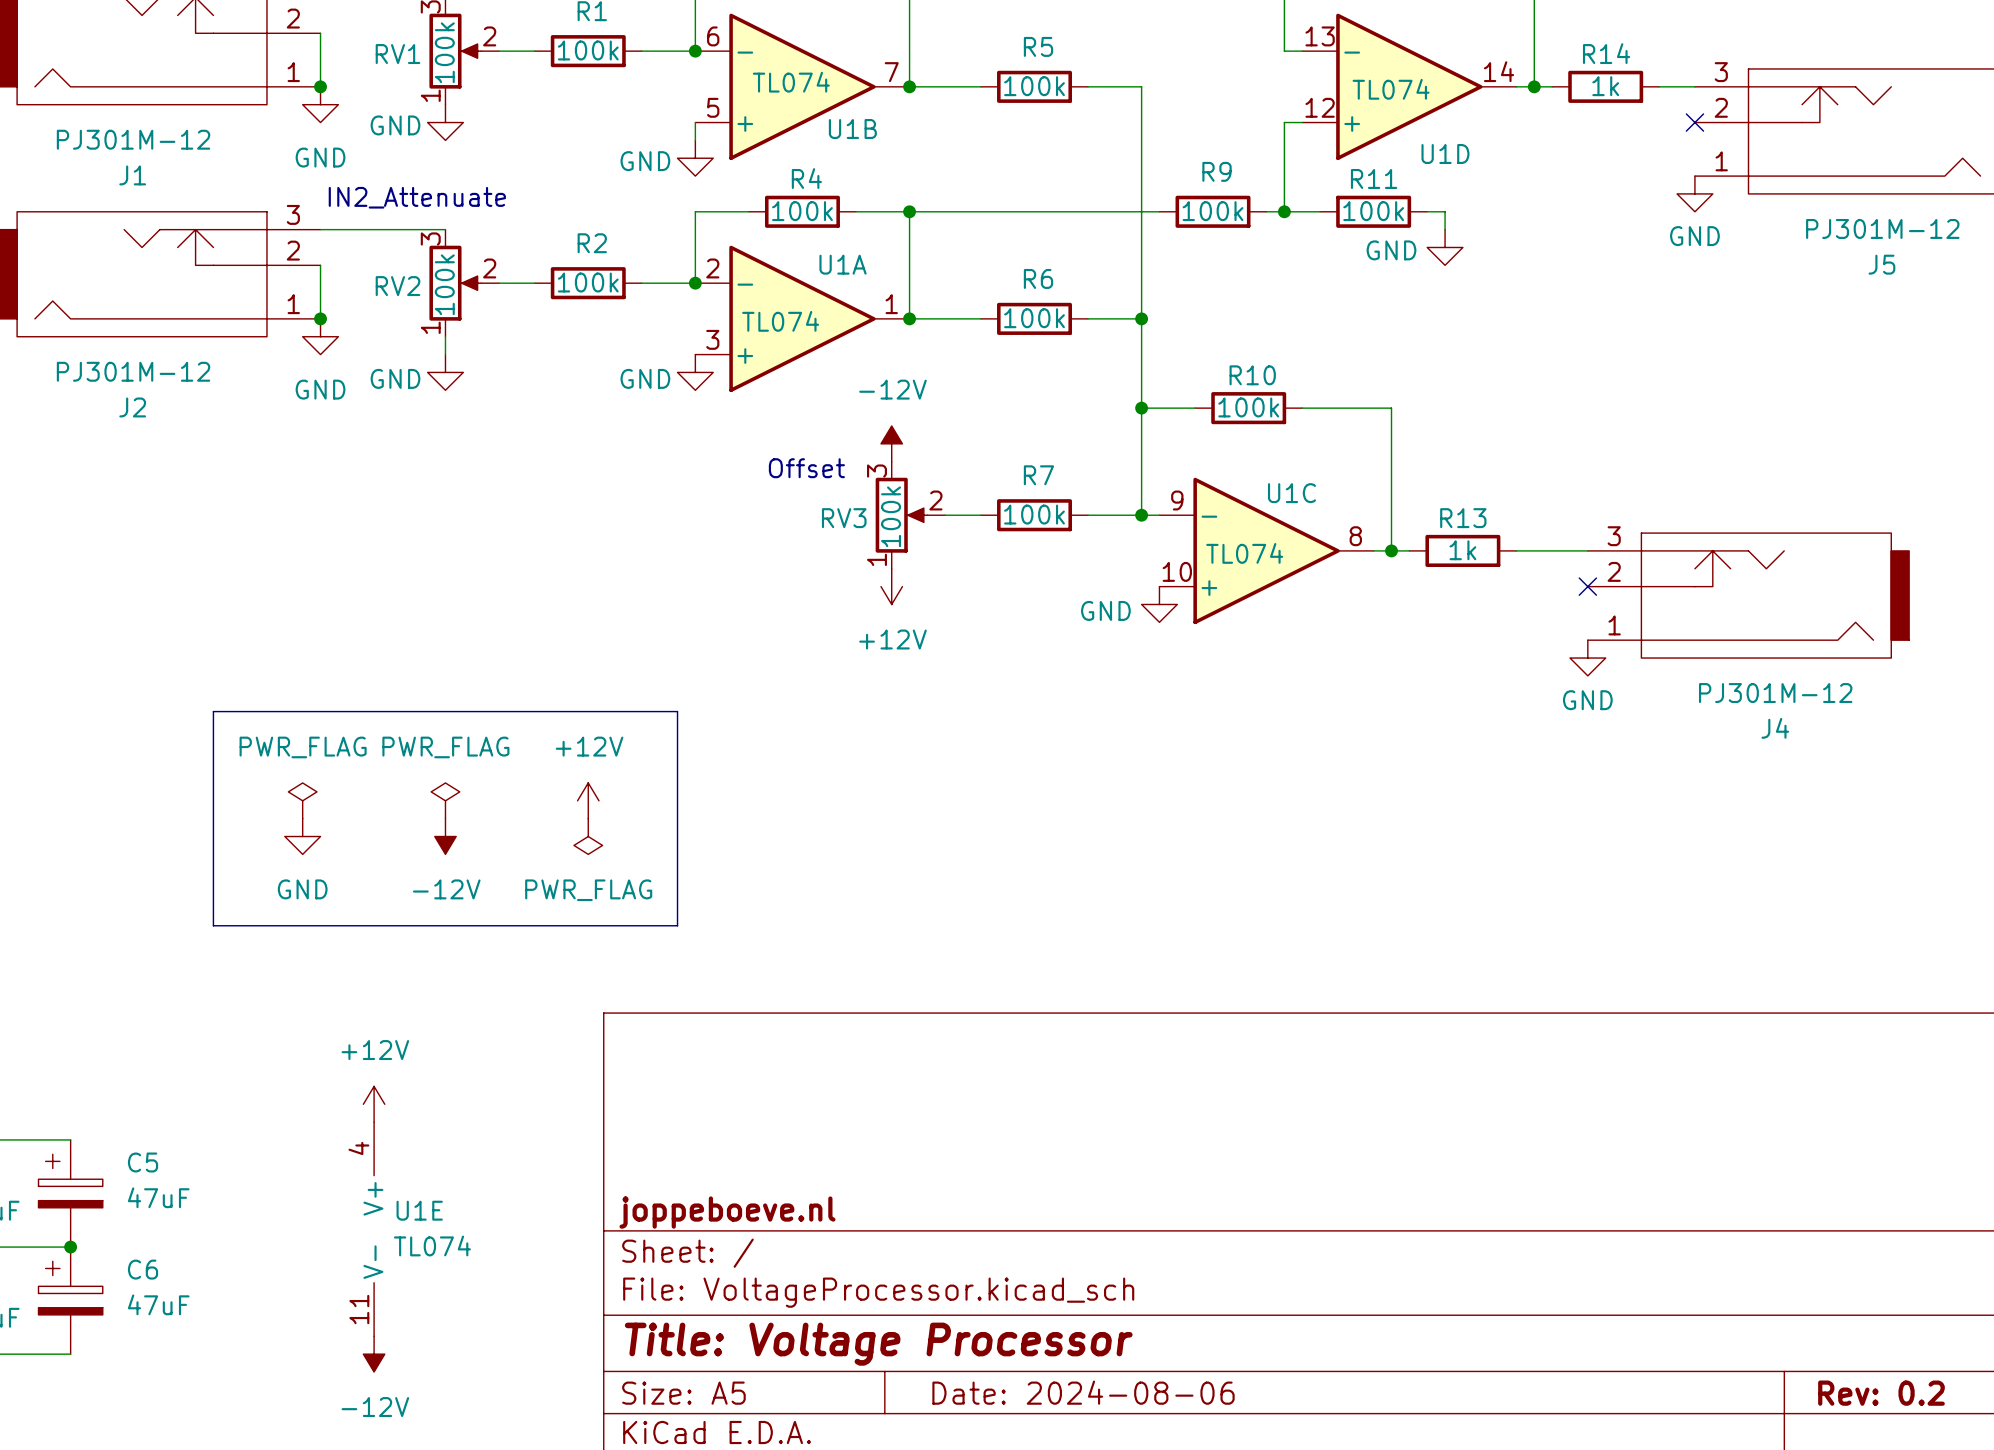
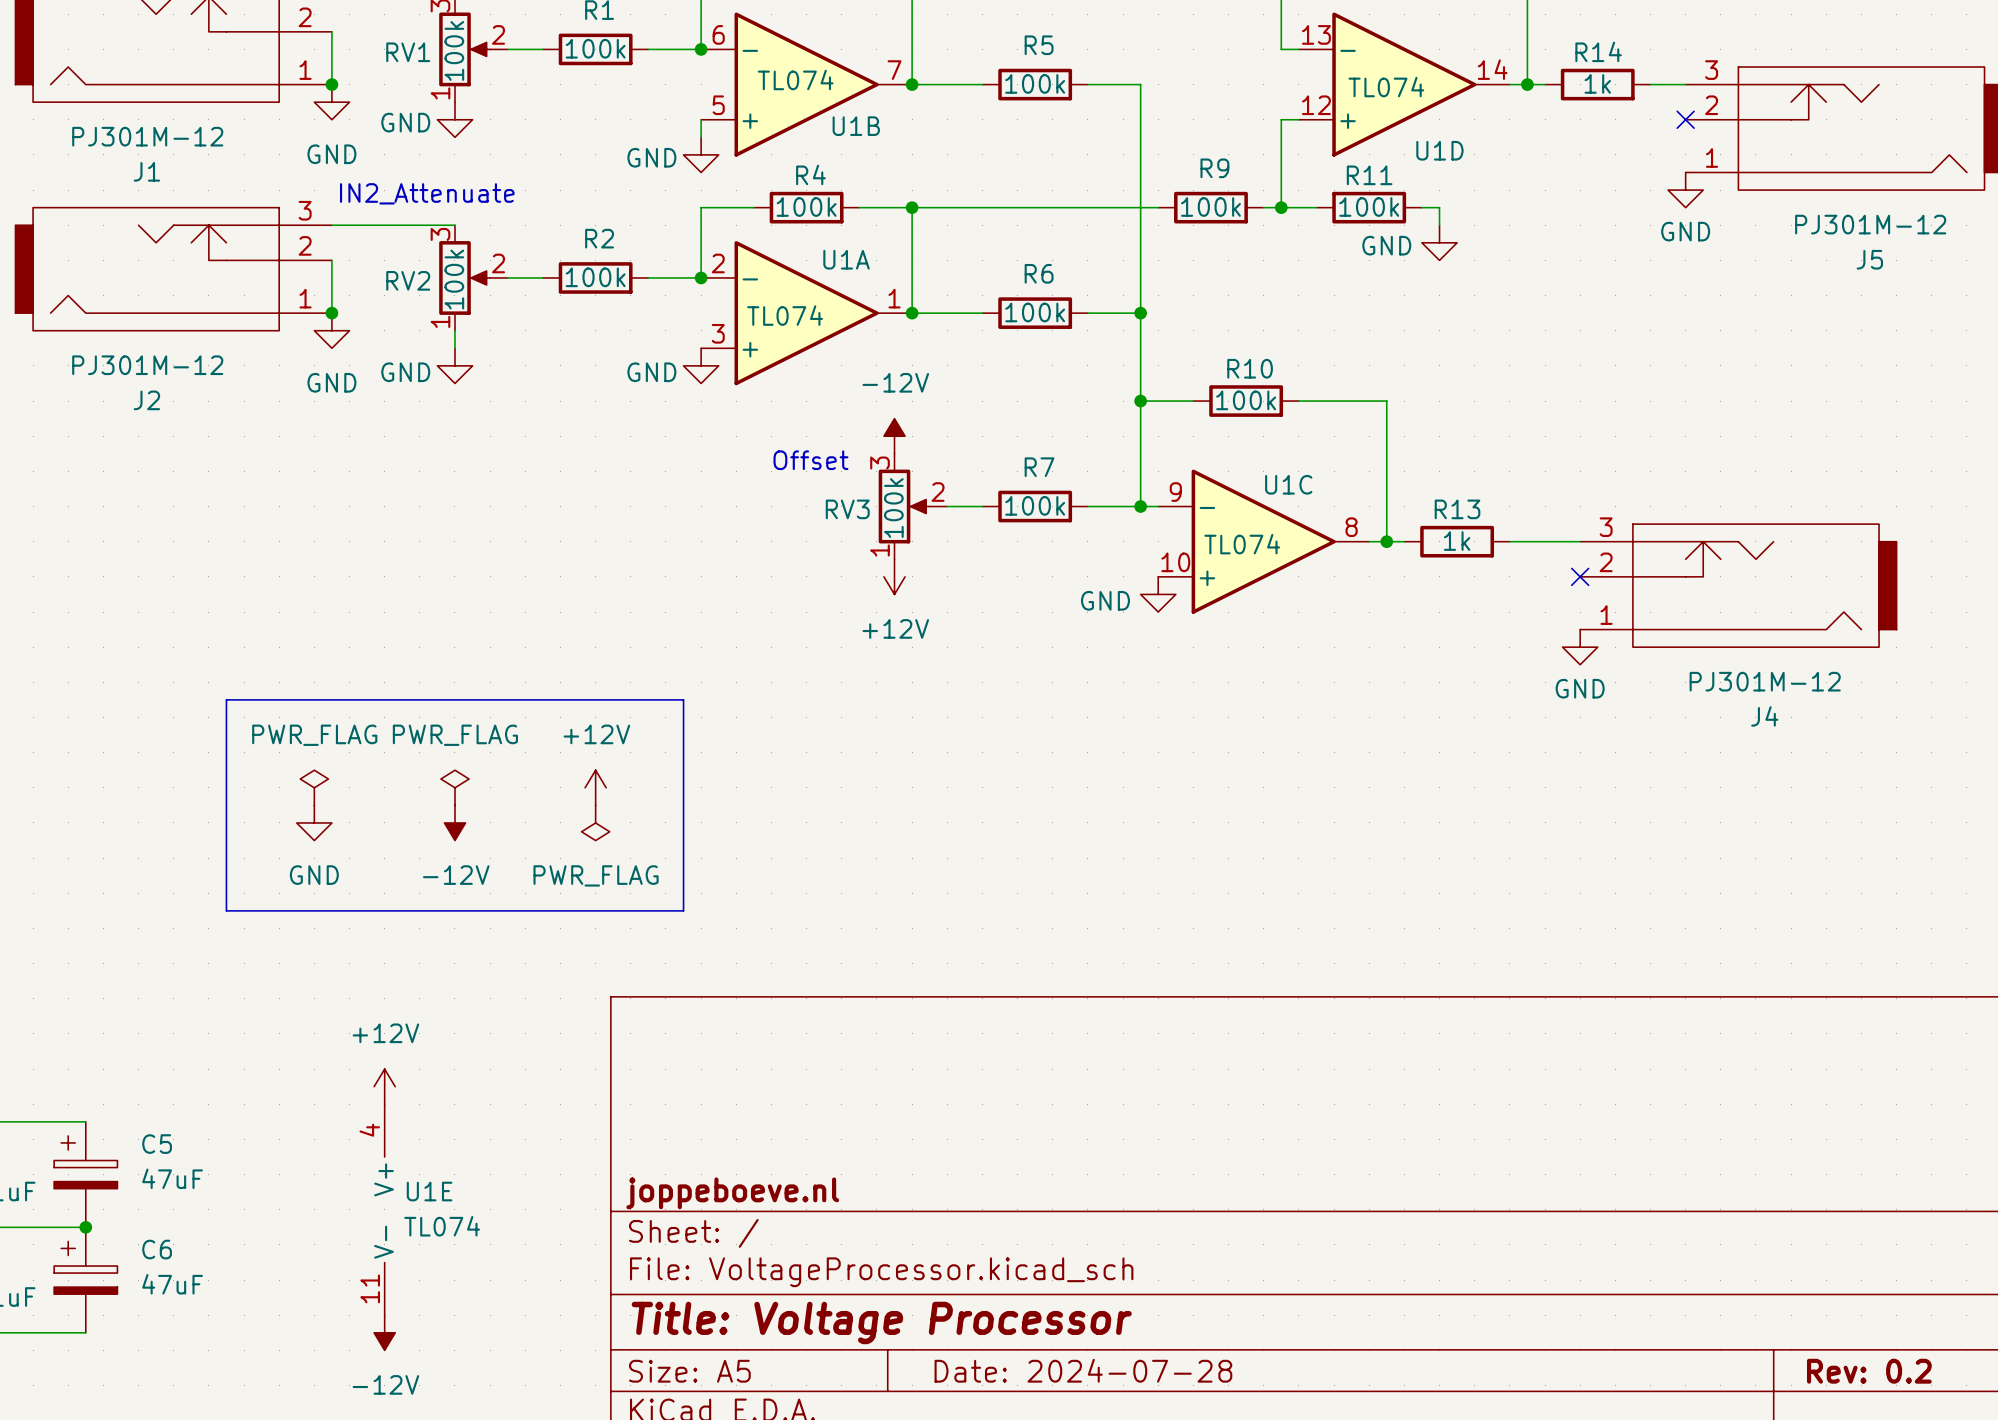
title block: Date: 2024-08-06 (1083, 1392) -> Date: 2024-07-28 (1083, 1370)

